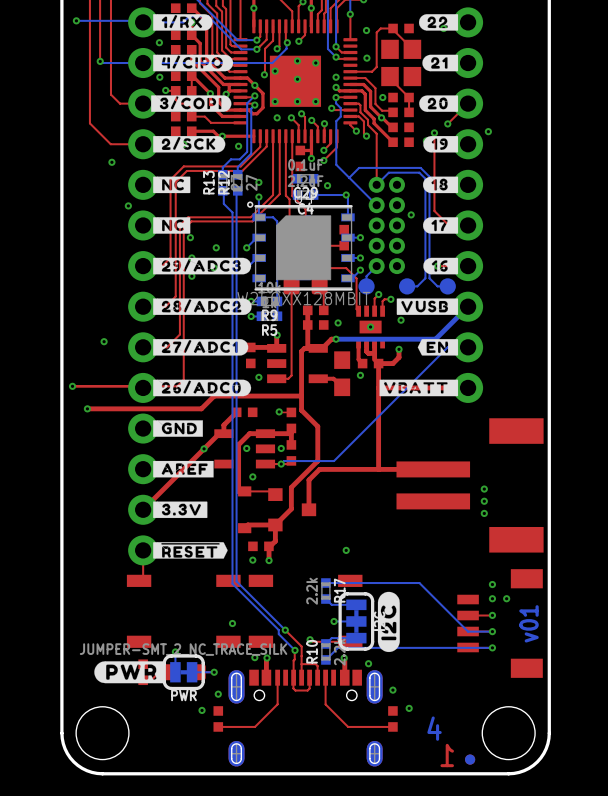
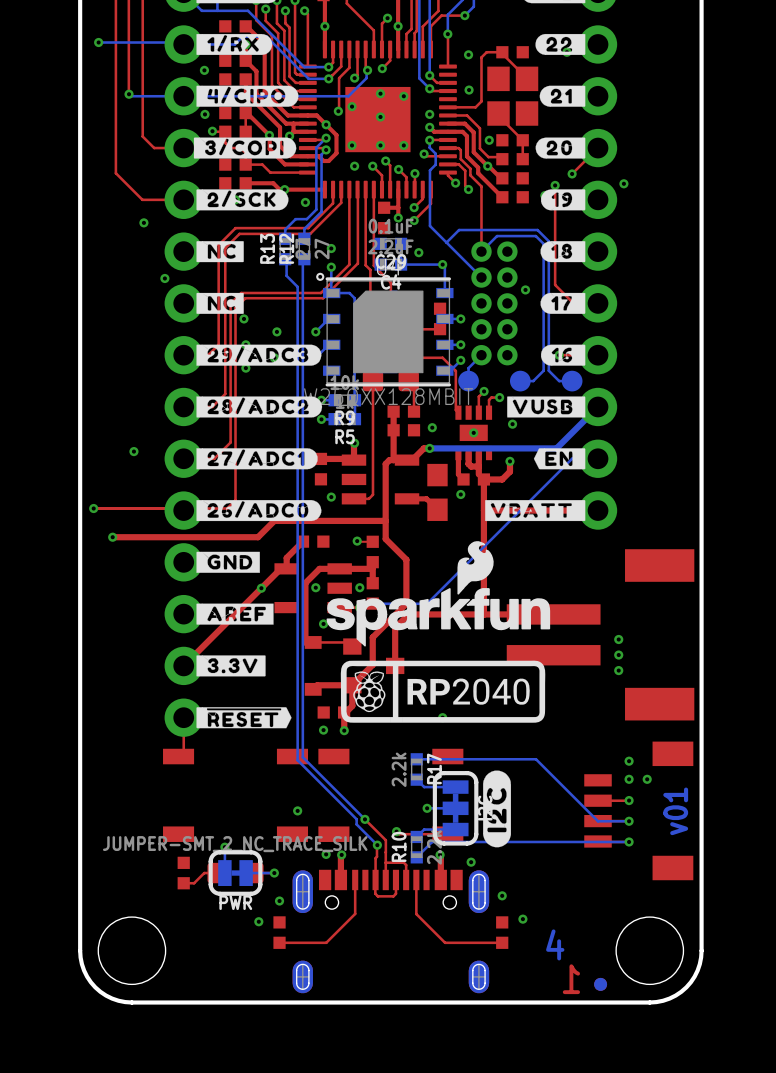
drawing: none -> [326, 541, 551, 723]
drawing: [94, 661, 165, 684] -> none

